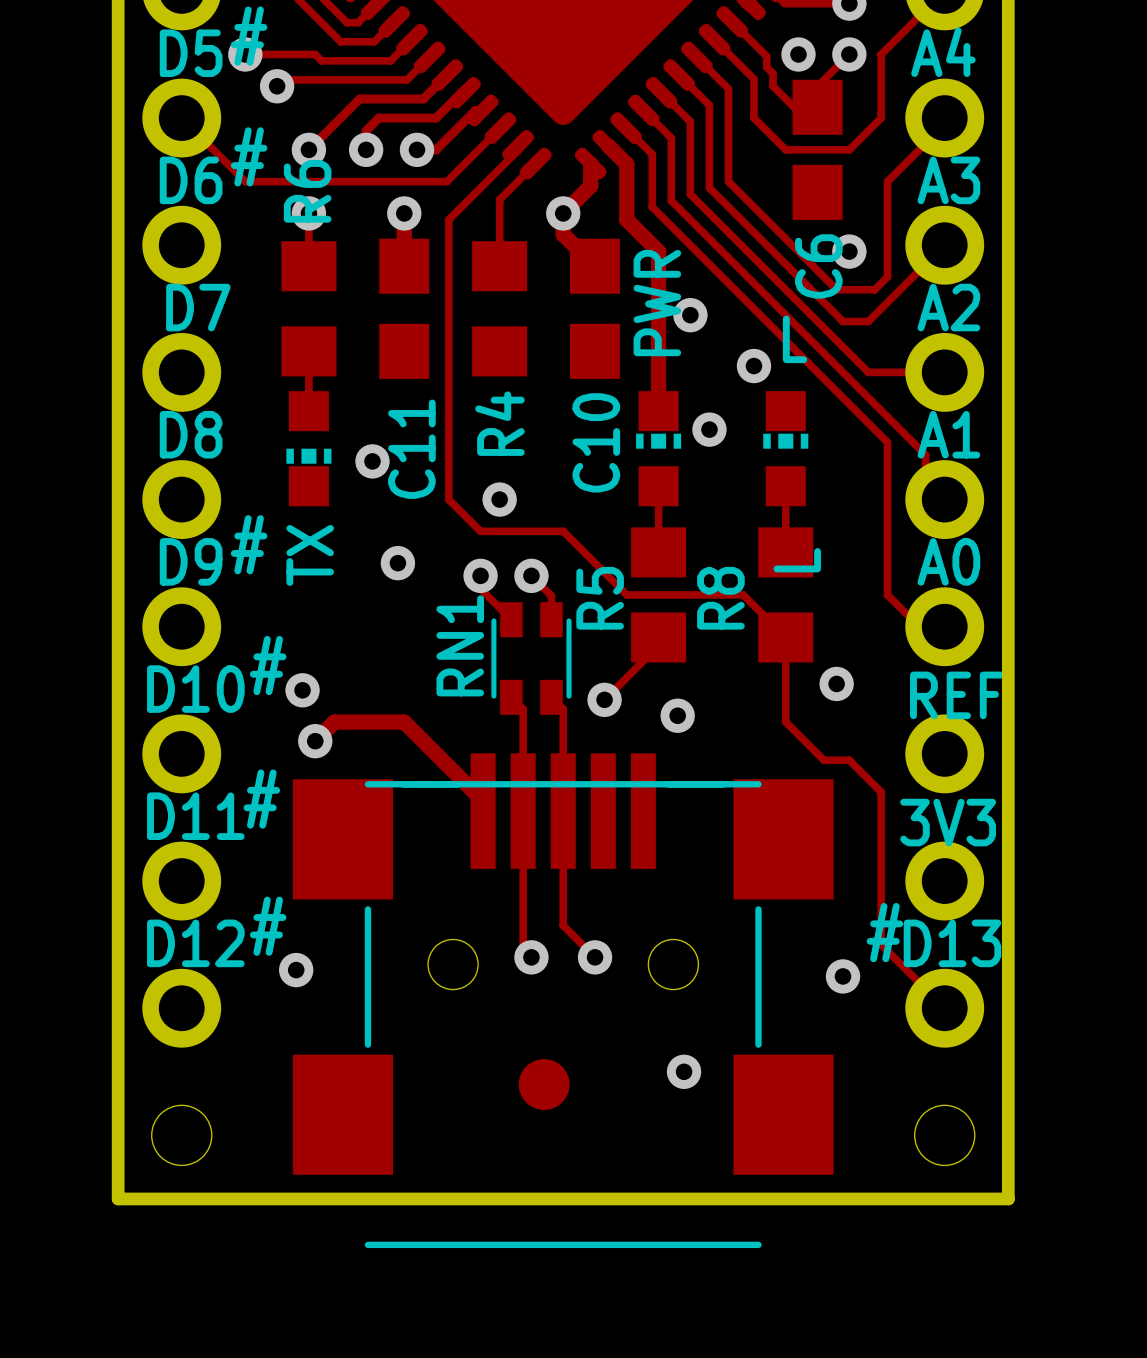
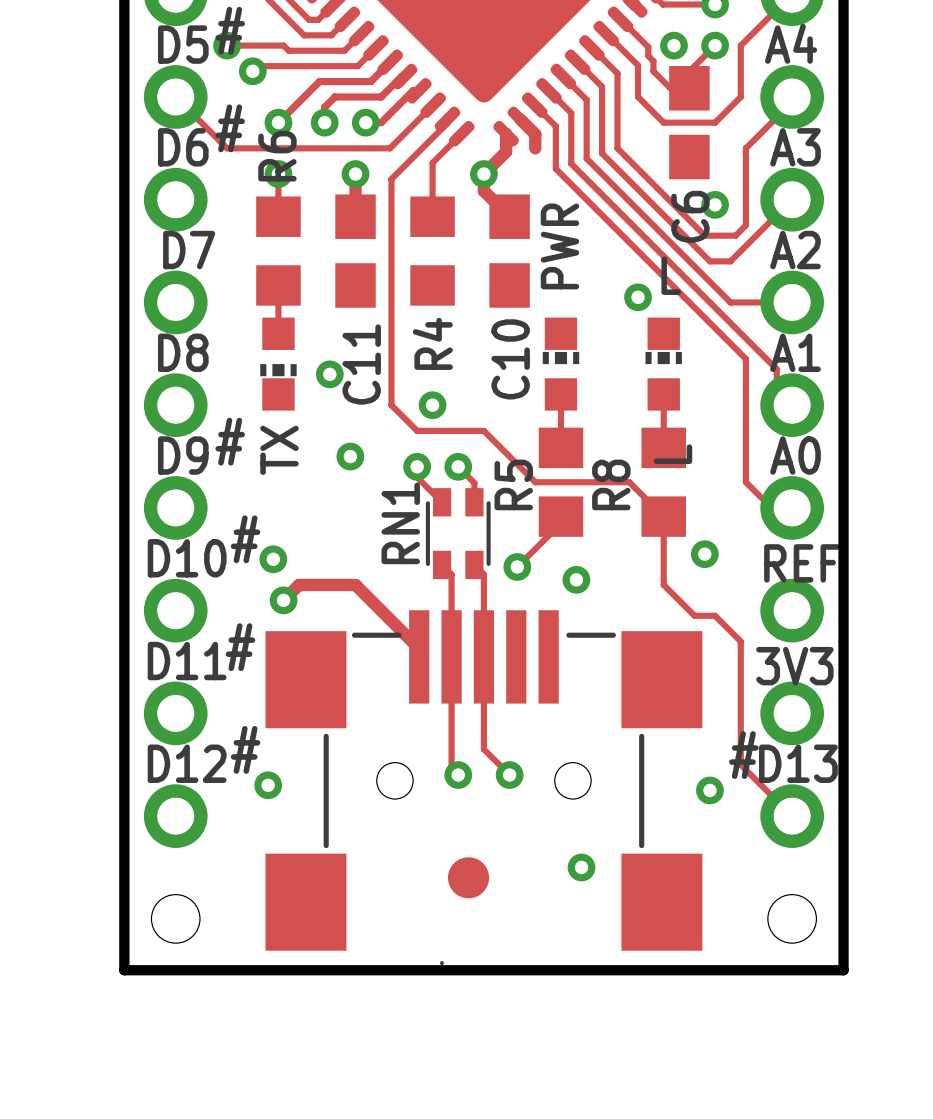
track: (626, 181) (626, 219) (658, 251) (658, 411) -> none
via: (690, 315) -> none
via: (709, 429) -> none
part footprint: [292, 753, 834, 1249] -> [265, 610, 703, 966]

